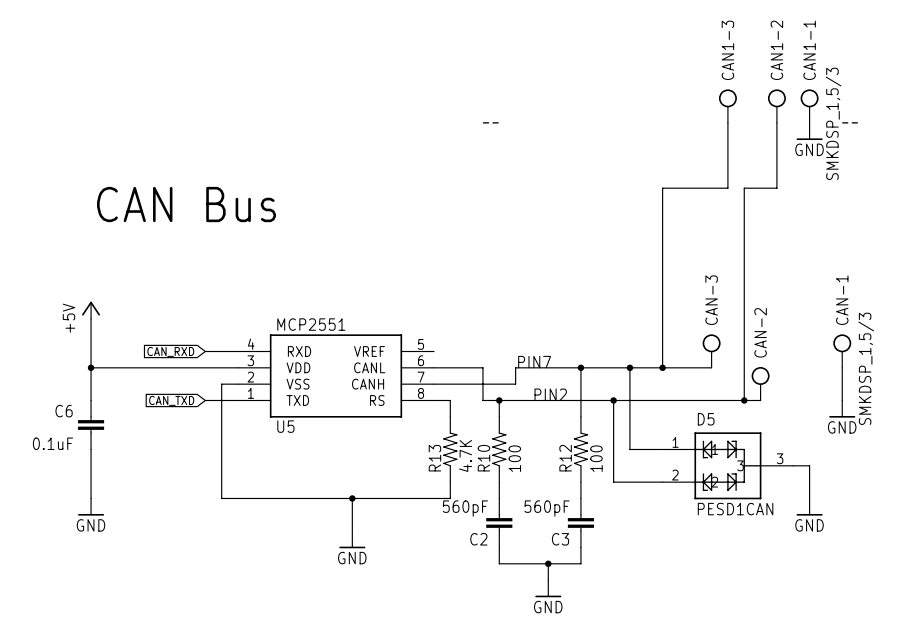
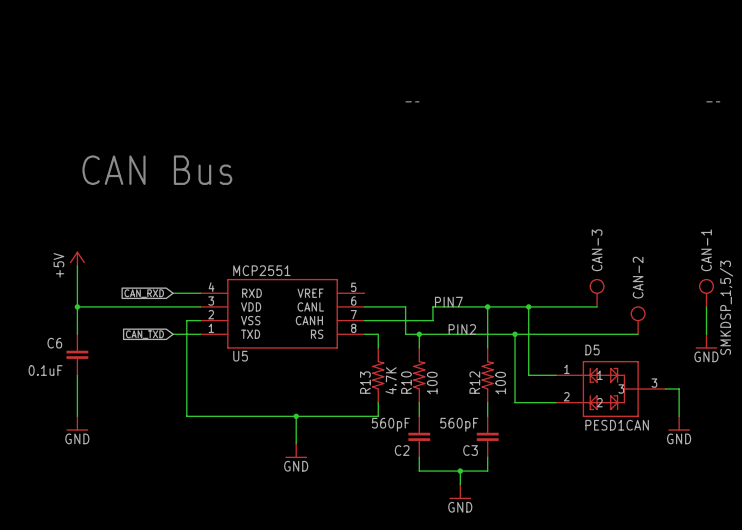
CAN1-3: (727, 106) -> none
CAN1-2: (776, 106) -> none
CAN1-1: SMKDSP_1,5/3 (809, 106) -> none
wire: (727, 122) (727, 188) (662, 188) (662, 367) -> none
wire: (776, 122) (776, 188) (744, 188) (744, 400) -> none
power symbol: GND (809, 131) -> none
junction: (662, 367) -> none
junction: (744, 400) -> none

